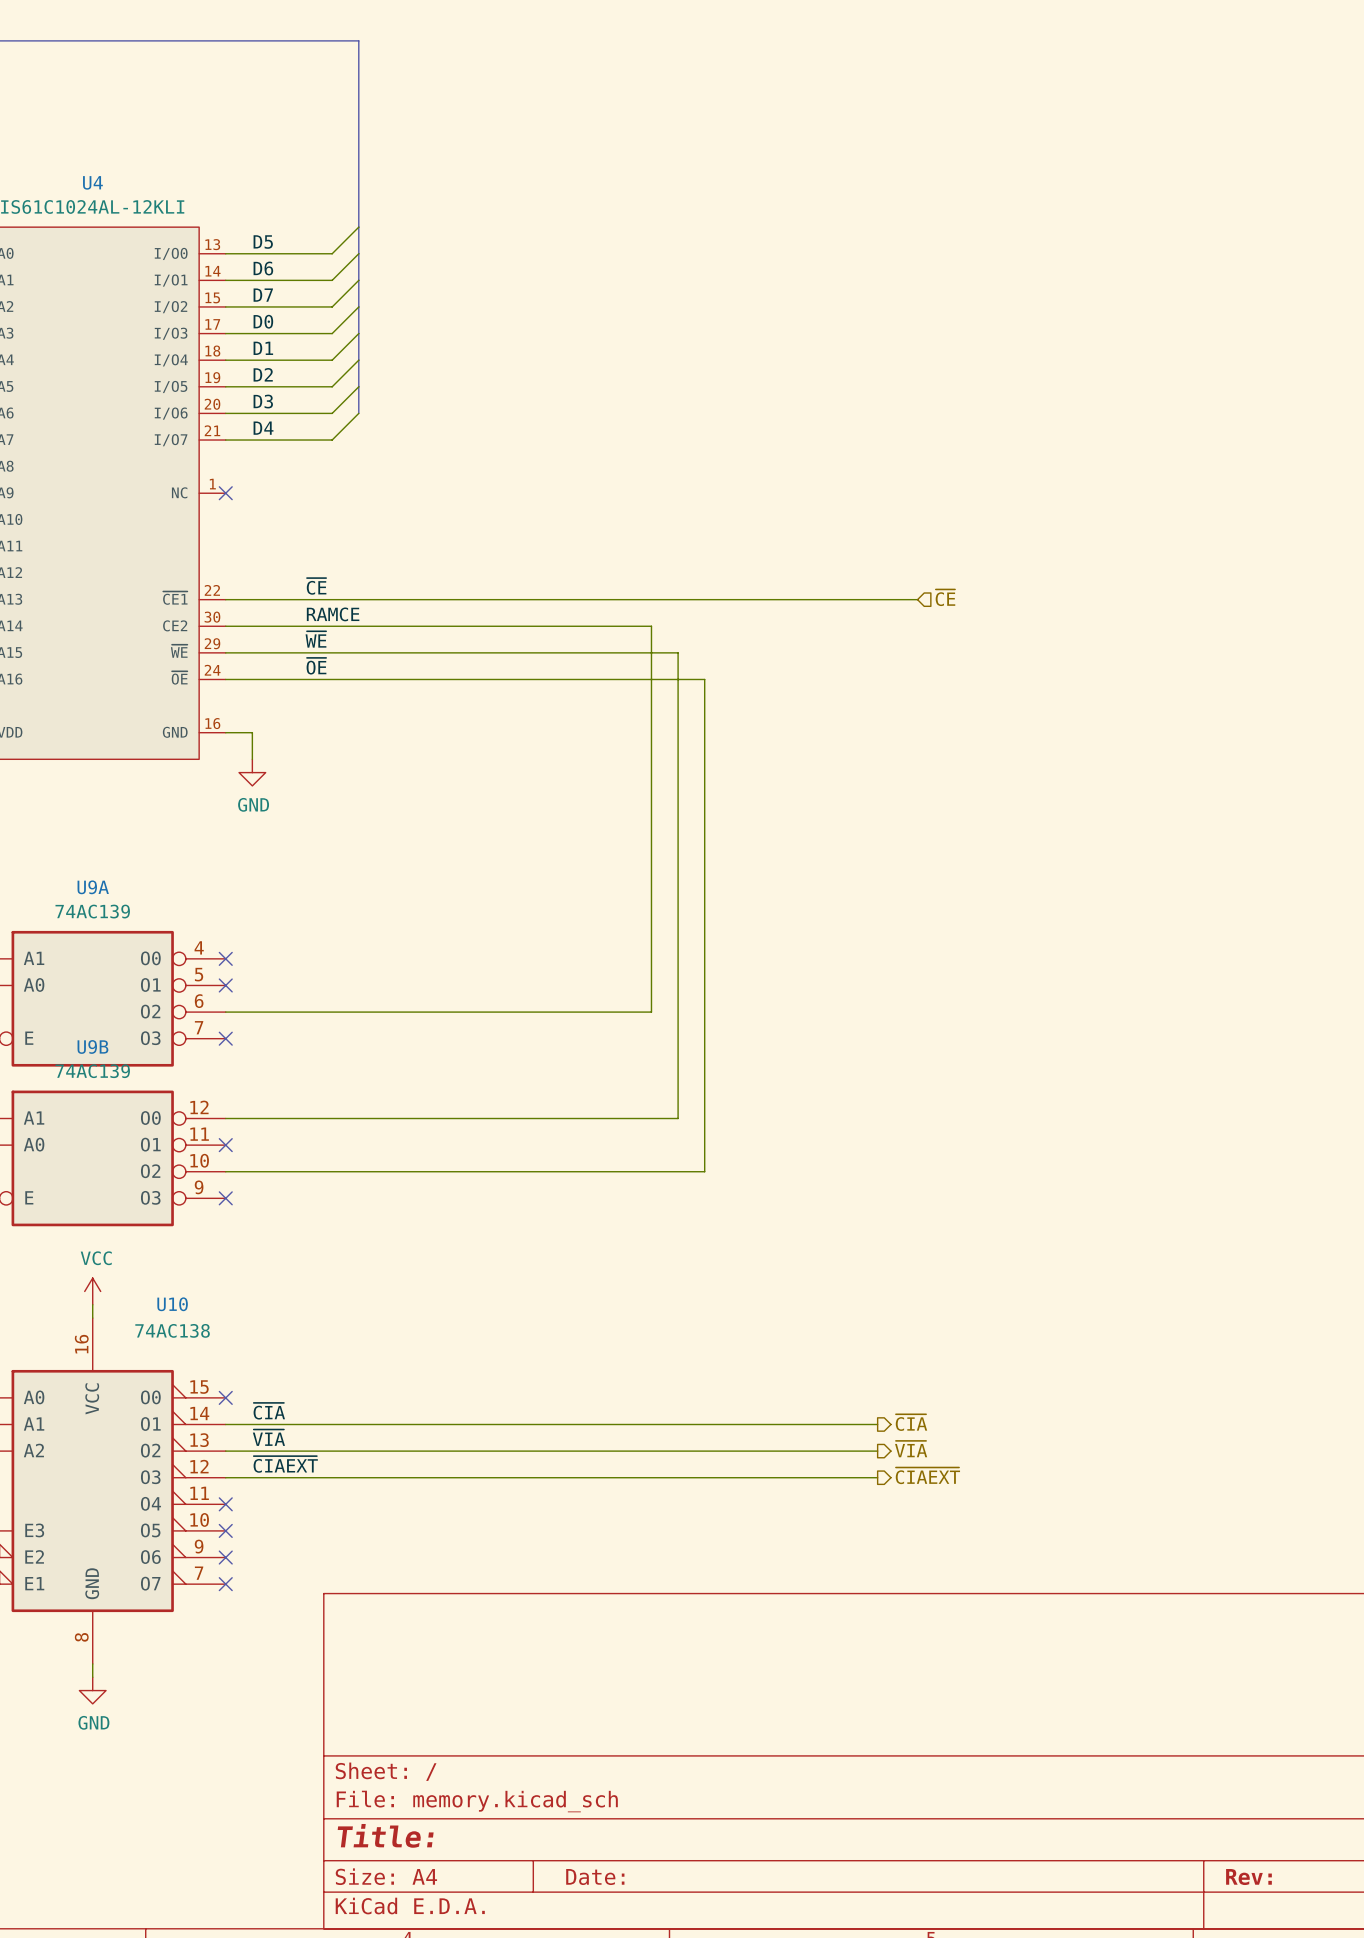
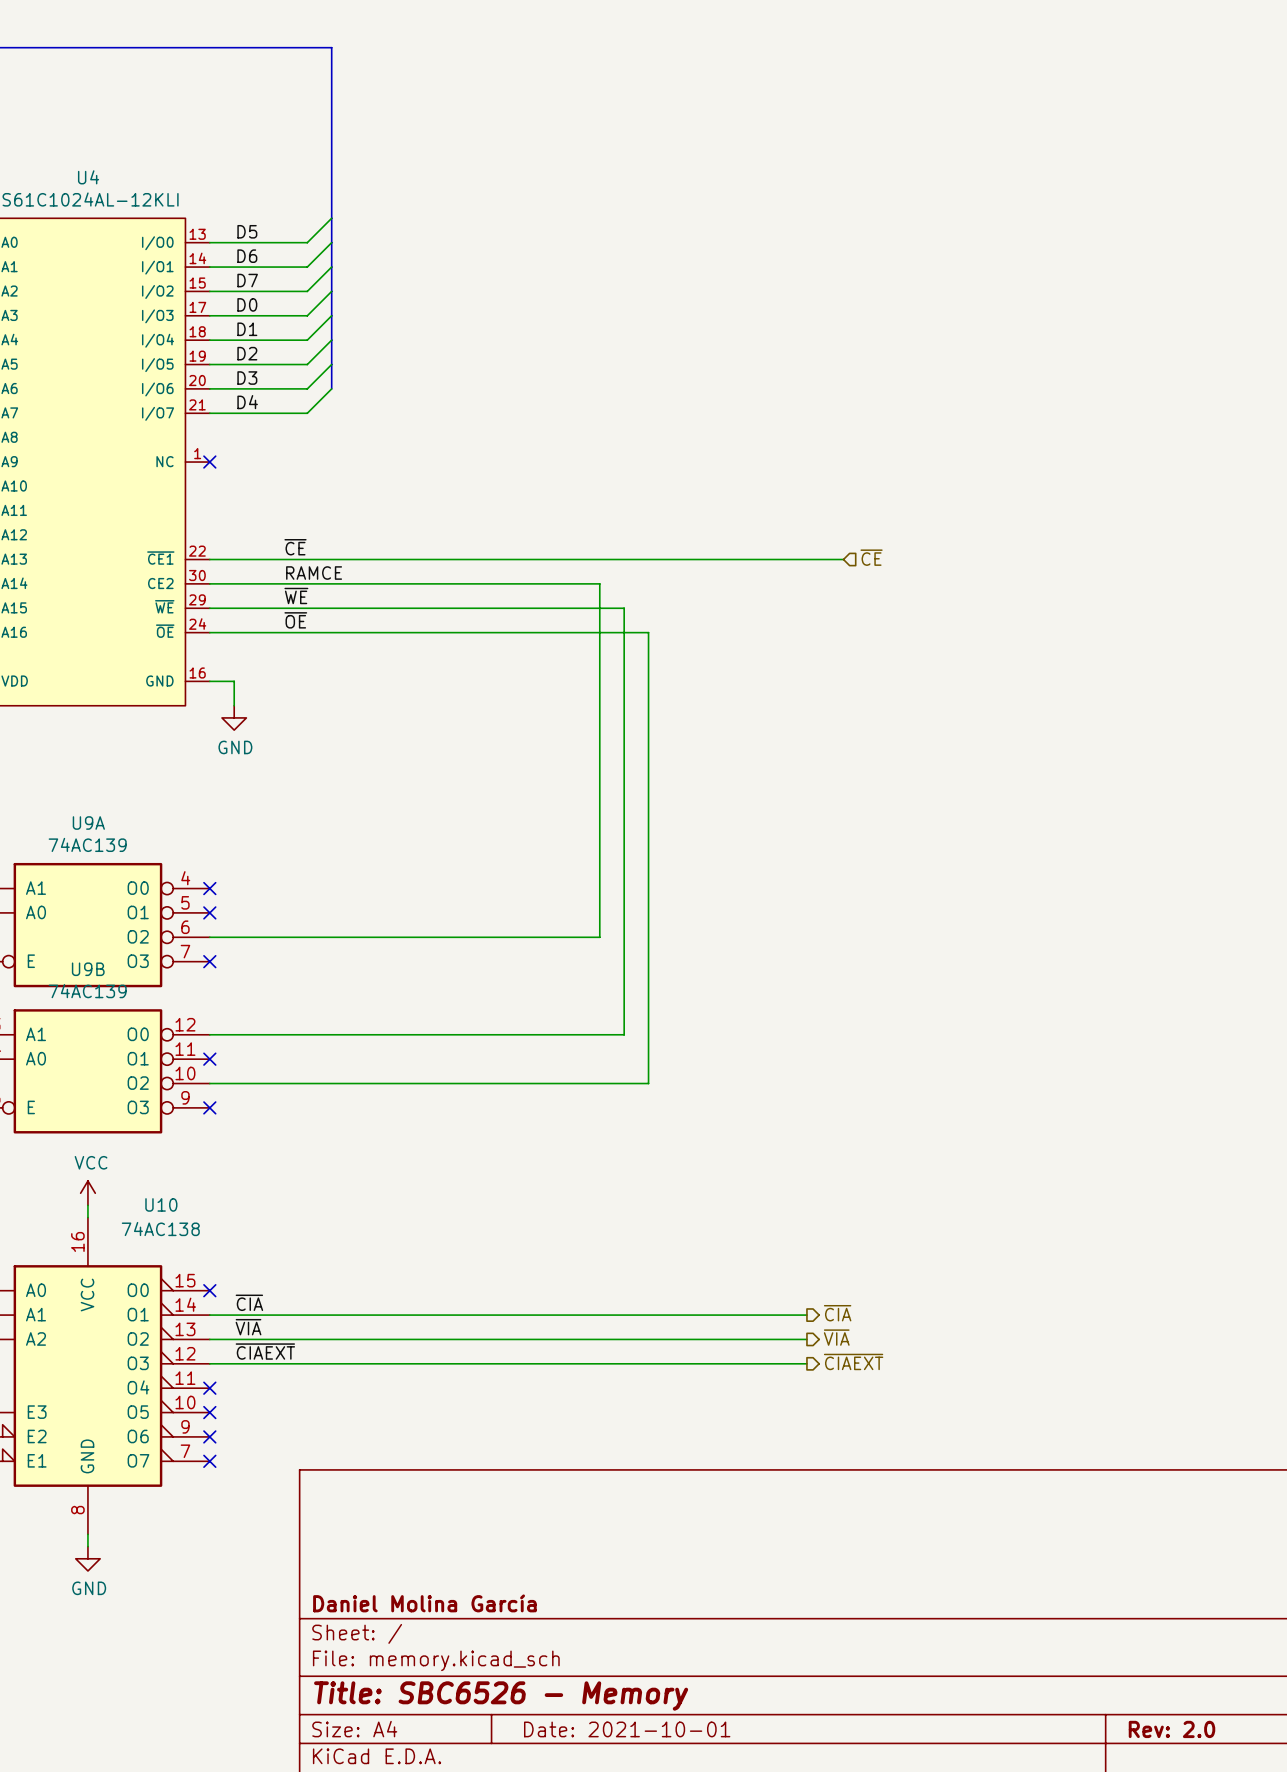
title block: none -> Daniel Molina García (424, 1603)
title block: Title: (385, 1835) -> Title: SBC6526 - Memory (501, 1696)
title block: Date: (595, 1877) -> Date: 2021-10-01 (627, 1729)
title block: Rev: (1248, 1877) -> Rev: 2.0 (1171, 1729)

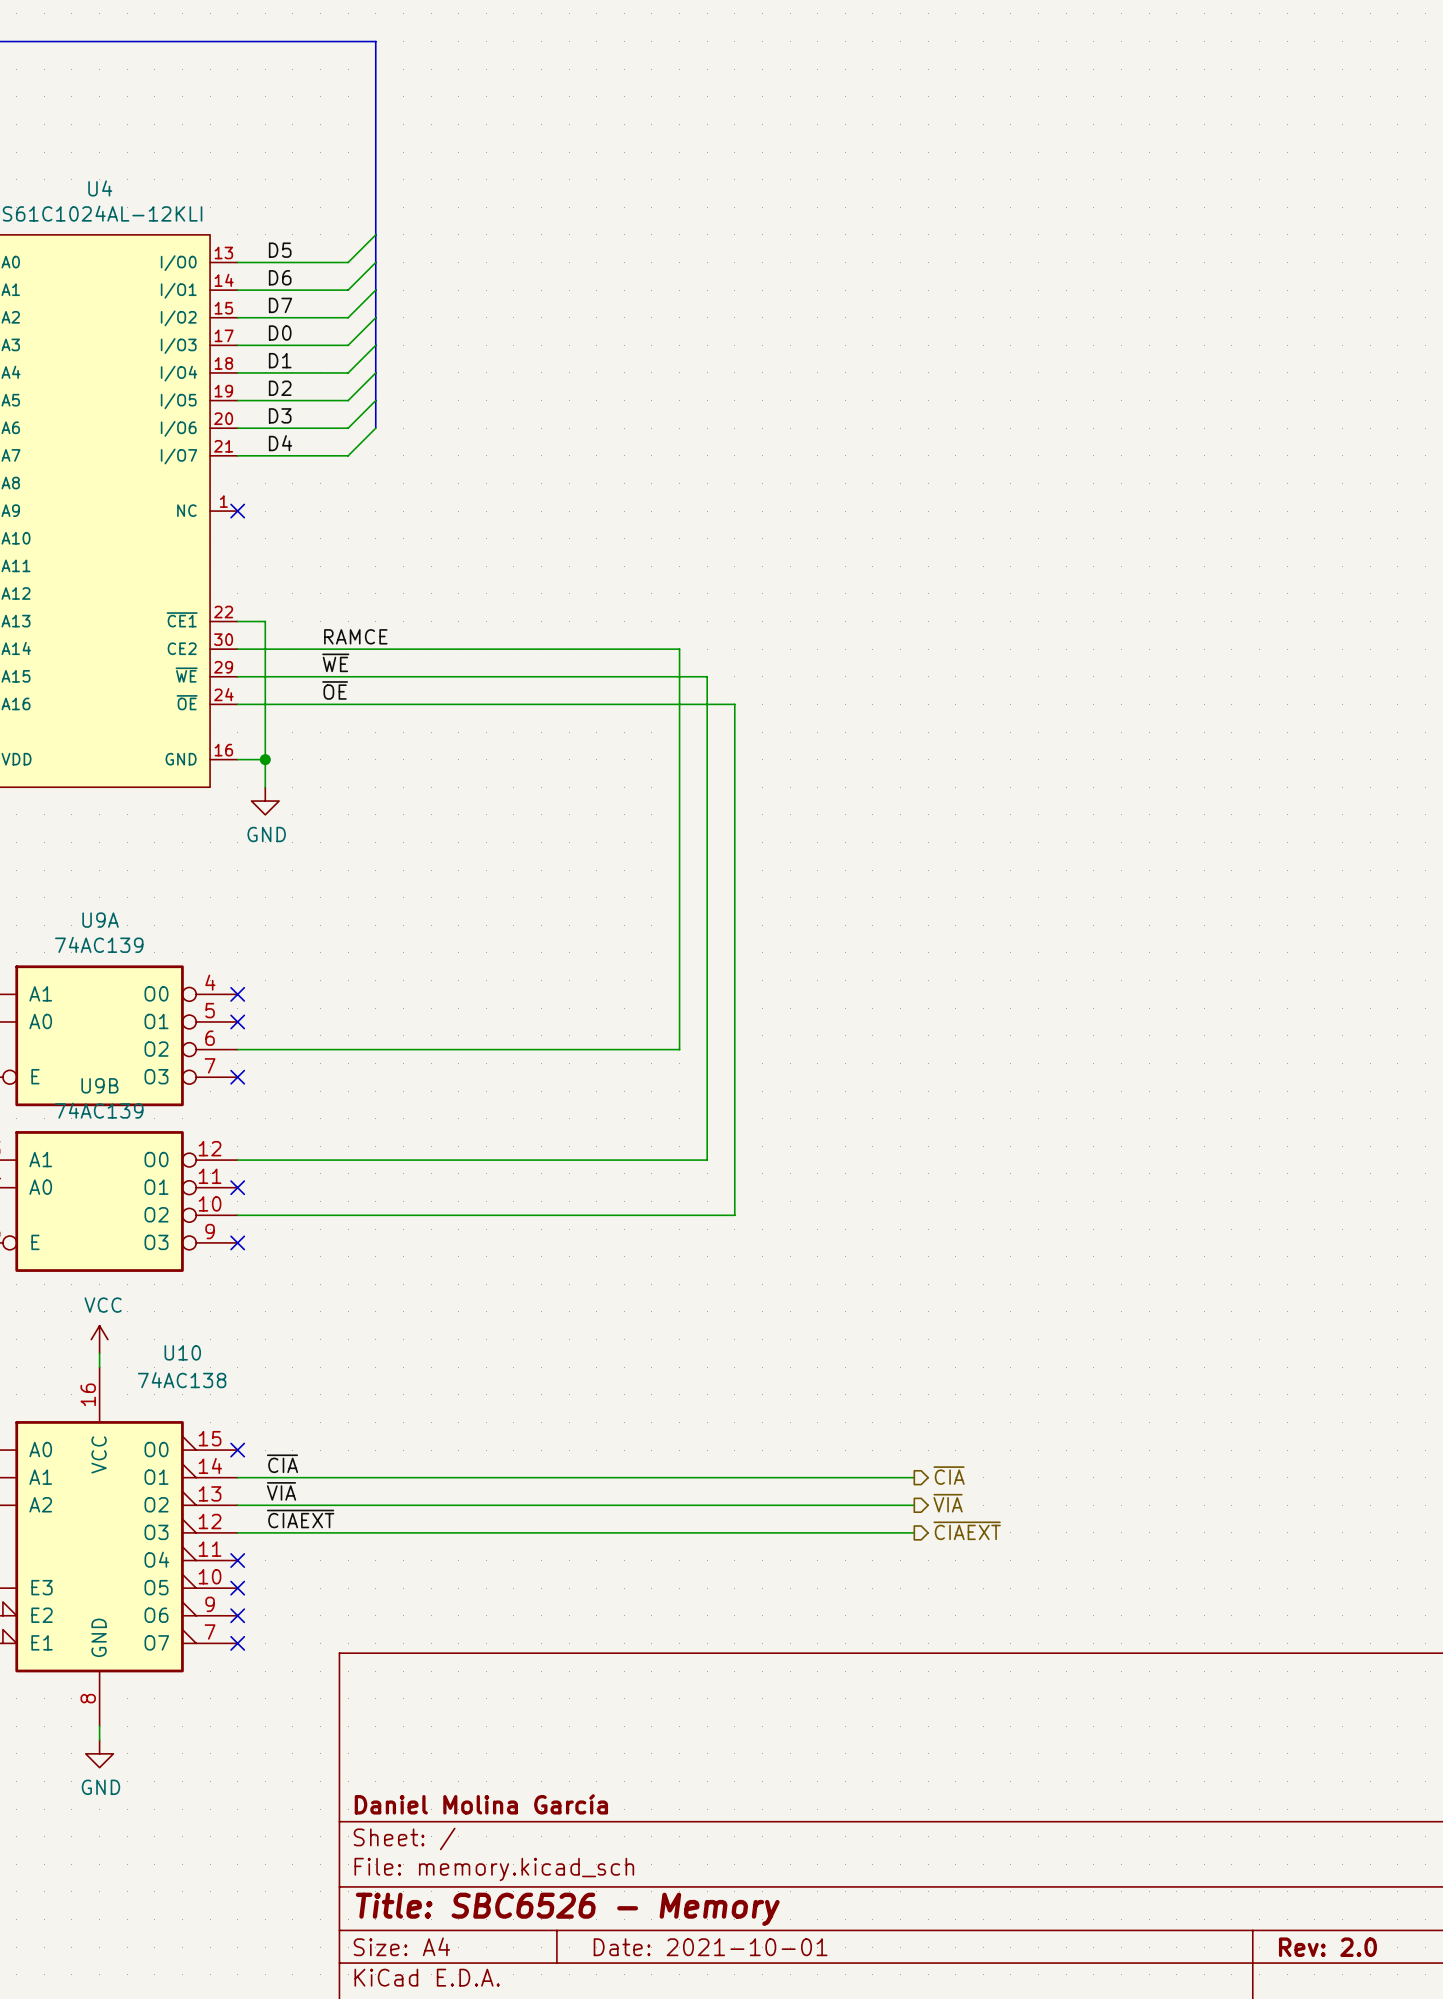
label: ~{CE} (295, 547) -> none
hierarchical label: ~{CE} (871, 557) -> none
wire: (234, 559) (843, 559) -> (265, 621) (265, 759)
junction: none -> (265, 759)

